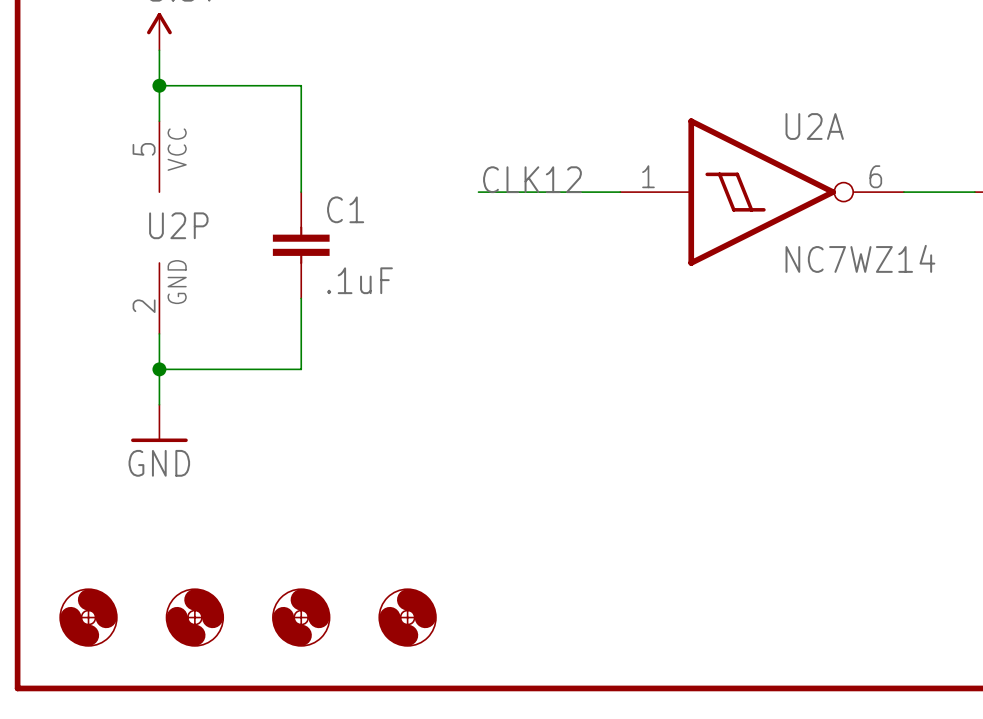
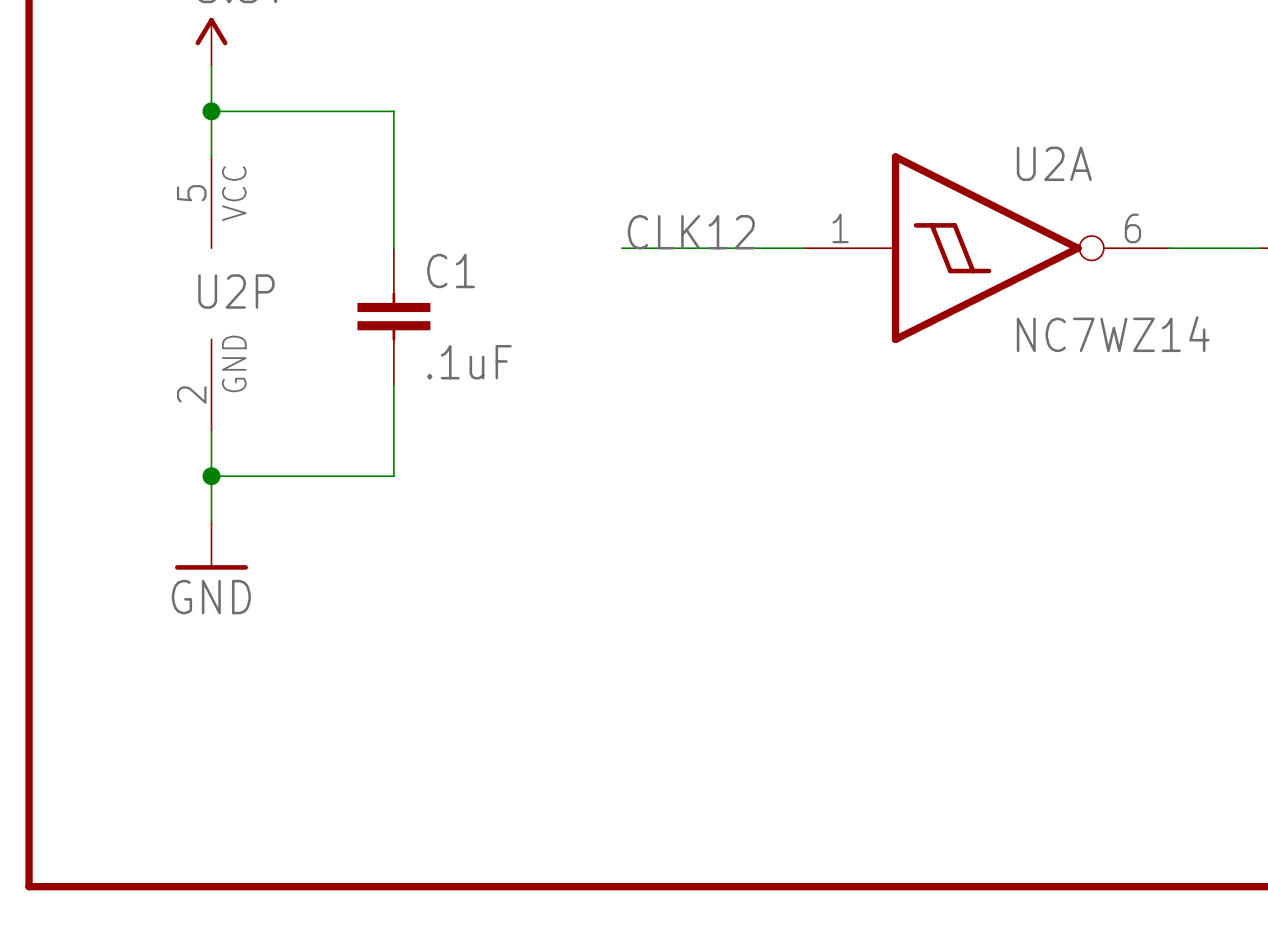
part: (88, 617) -> none
part: (194, 617) -> none
part: (301, 617) -> none
part: (407, 617) -> none

